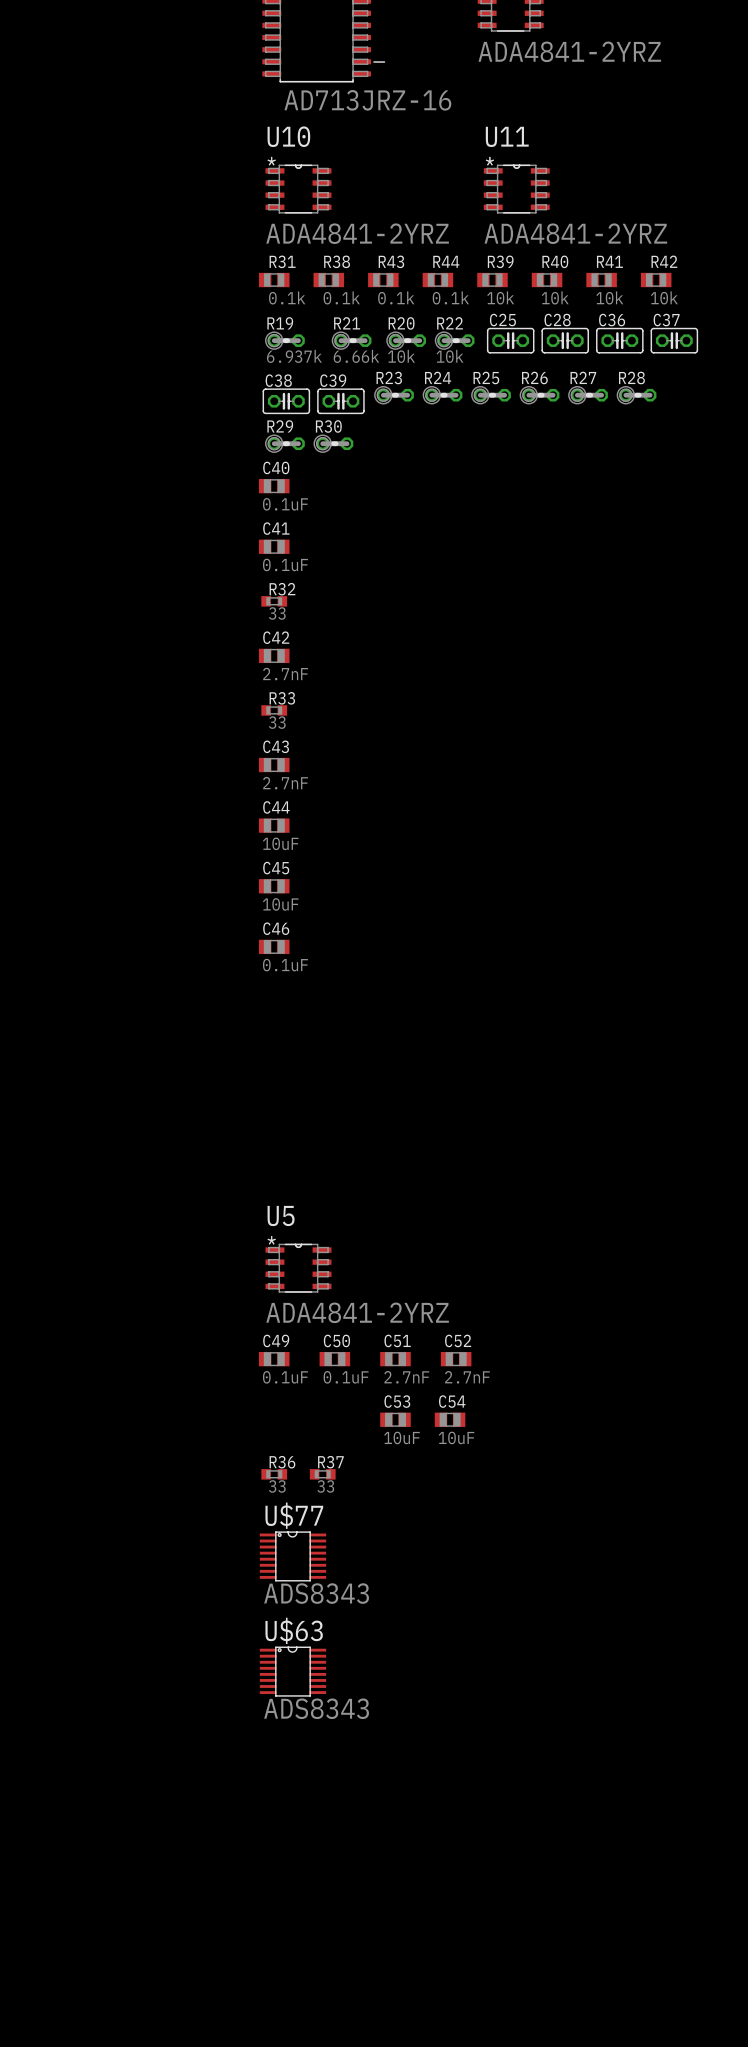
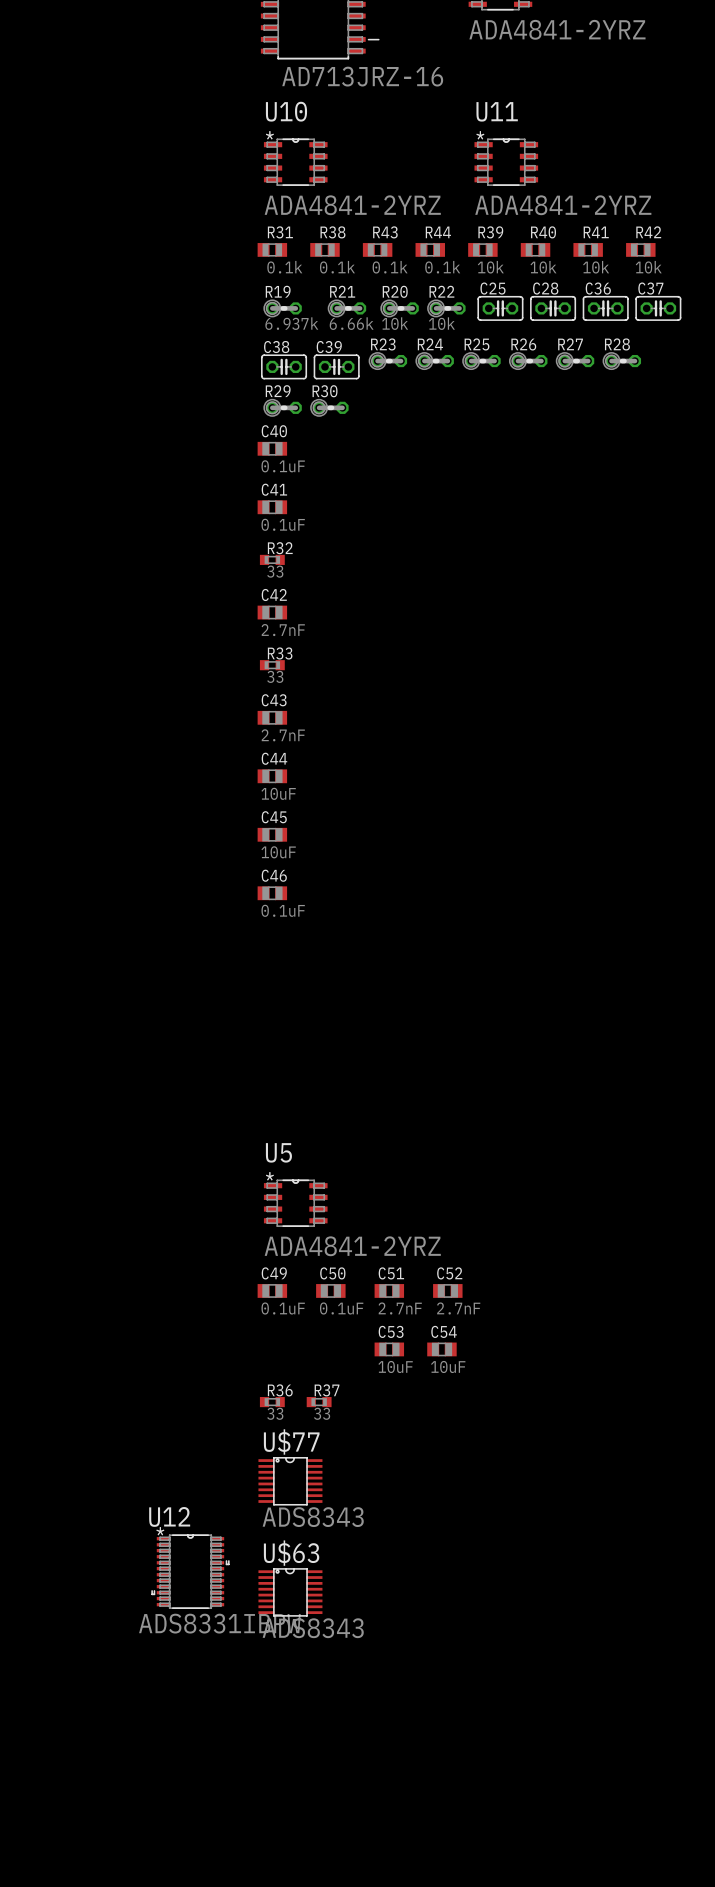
U12: none -> ADS8331IBPW (190, 1571)

